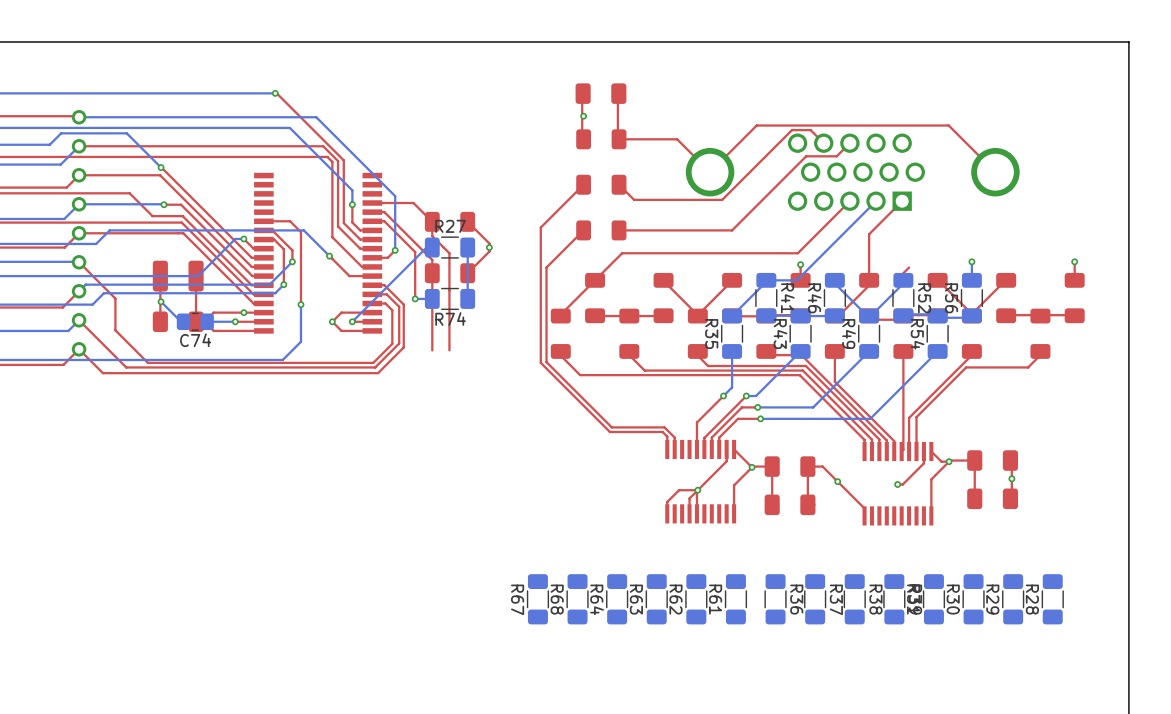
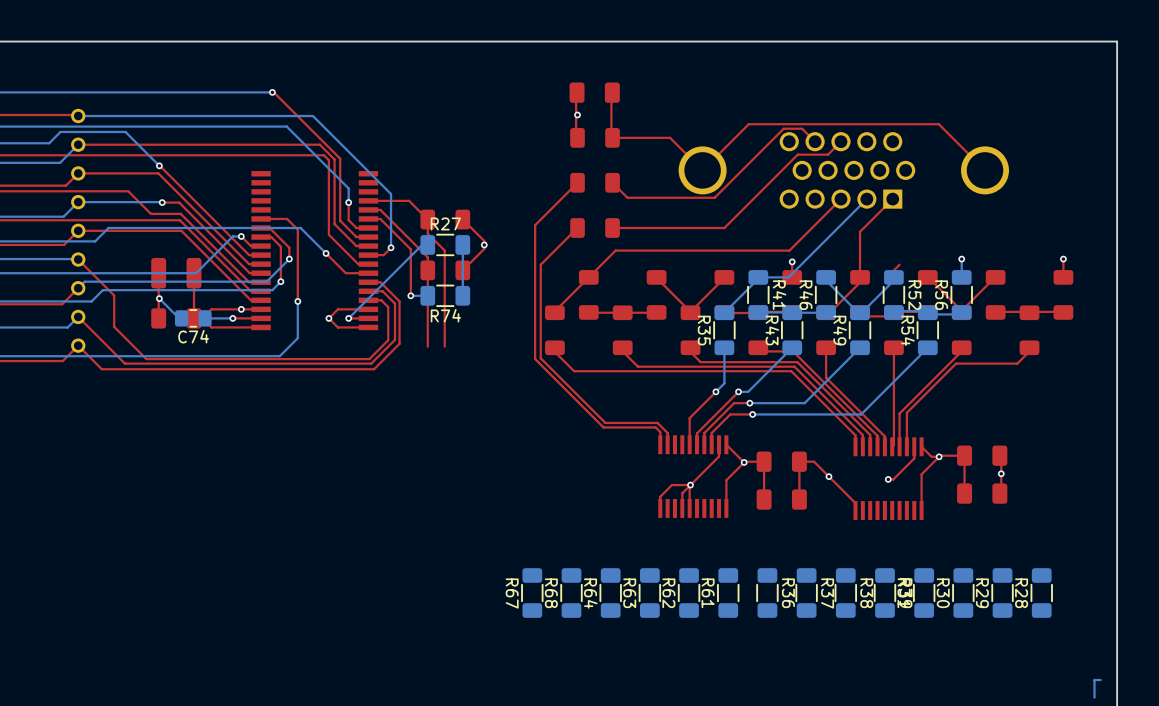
bottom track: none -> (1100, 680) (1094, 680) (1094, 697)

